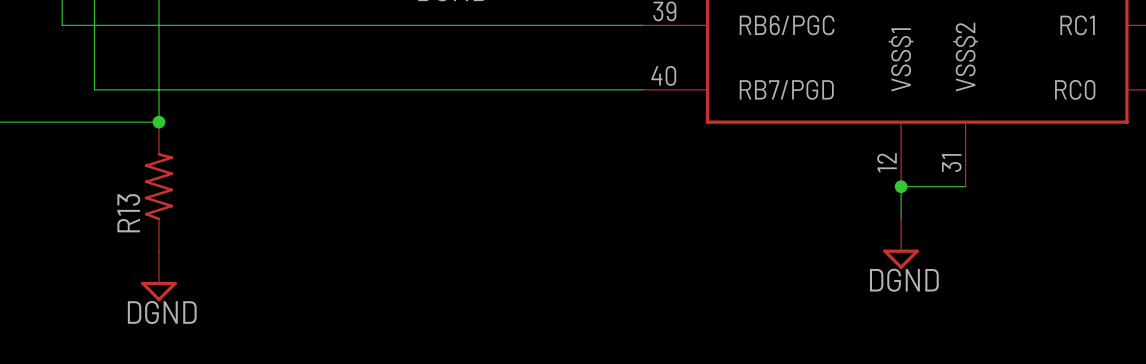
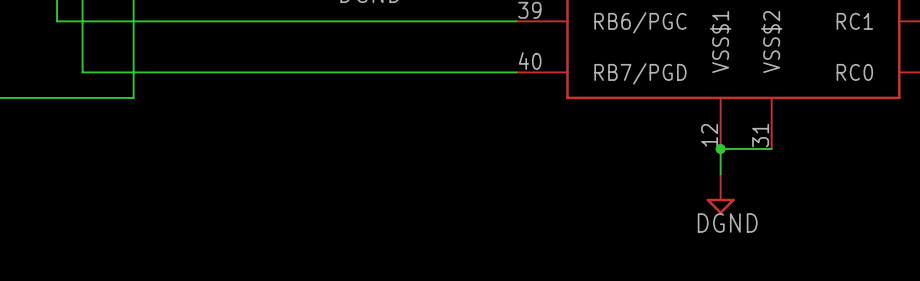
junction: (158, 122) -> none
R13: (158, 186) -> none
power symbol: DGND (158, 276) -> none

